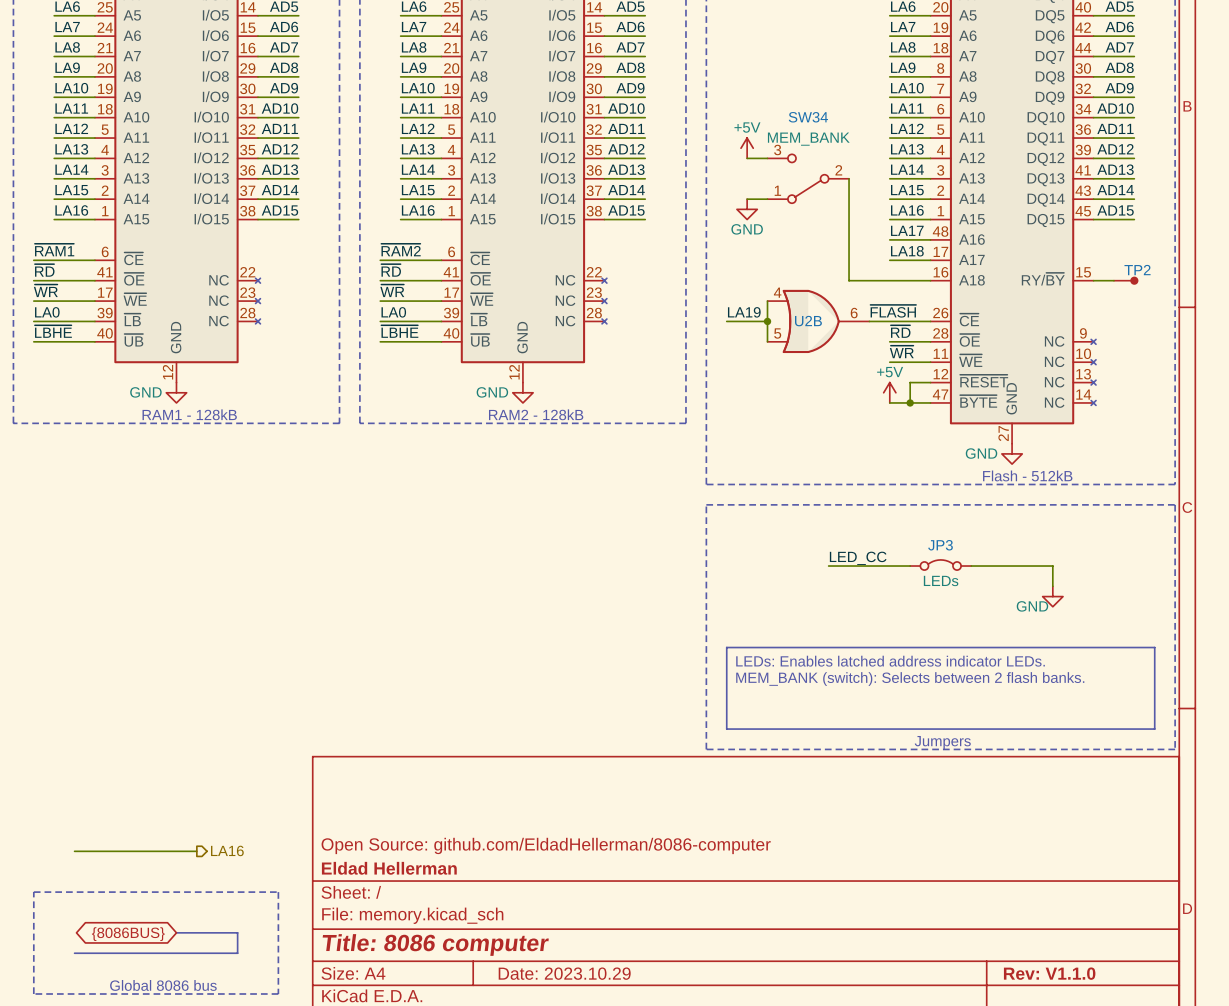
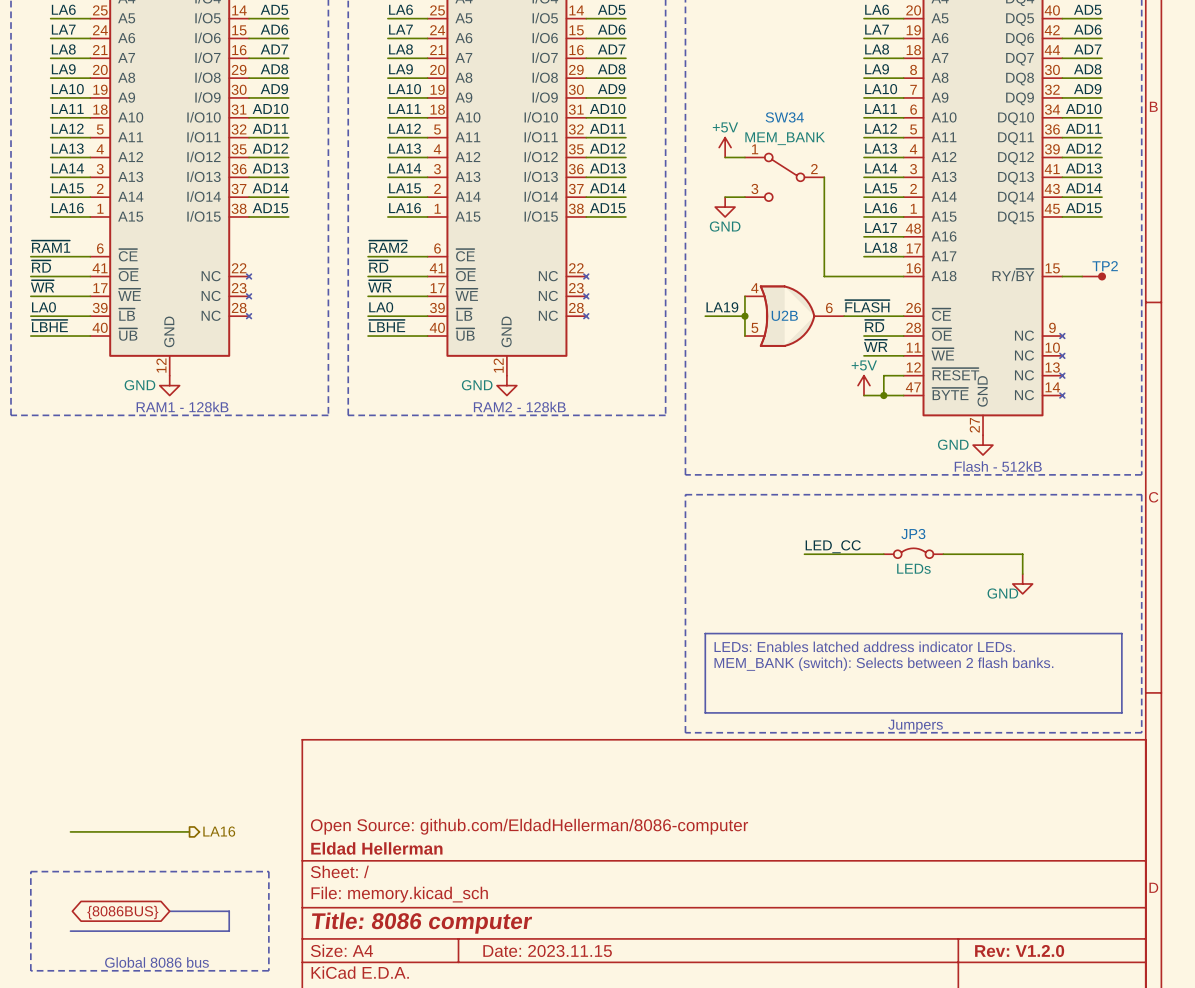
SW34 flip: as is (808, 178) -> up-down (784, 177)
title block: Date: 2023.10.29 (564, 973) -> Date: 2023.11.15 (547, 950)
title block: Rev: V1.1.0 (1049, 973) -> Rev: V1.2.0 (1019, 950)

